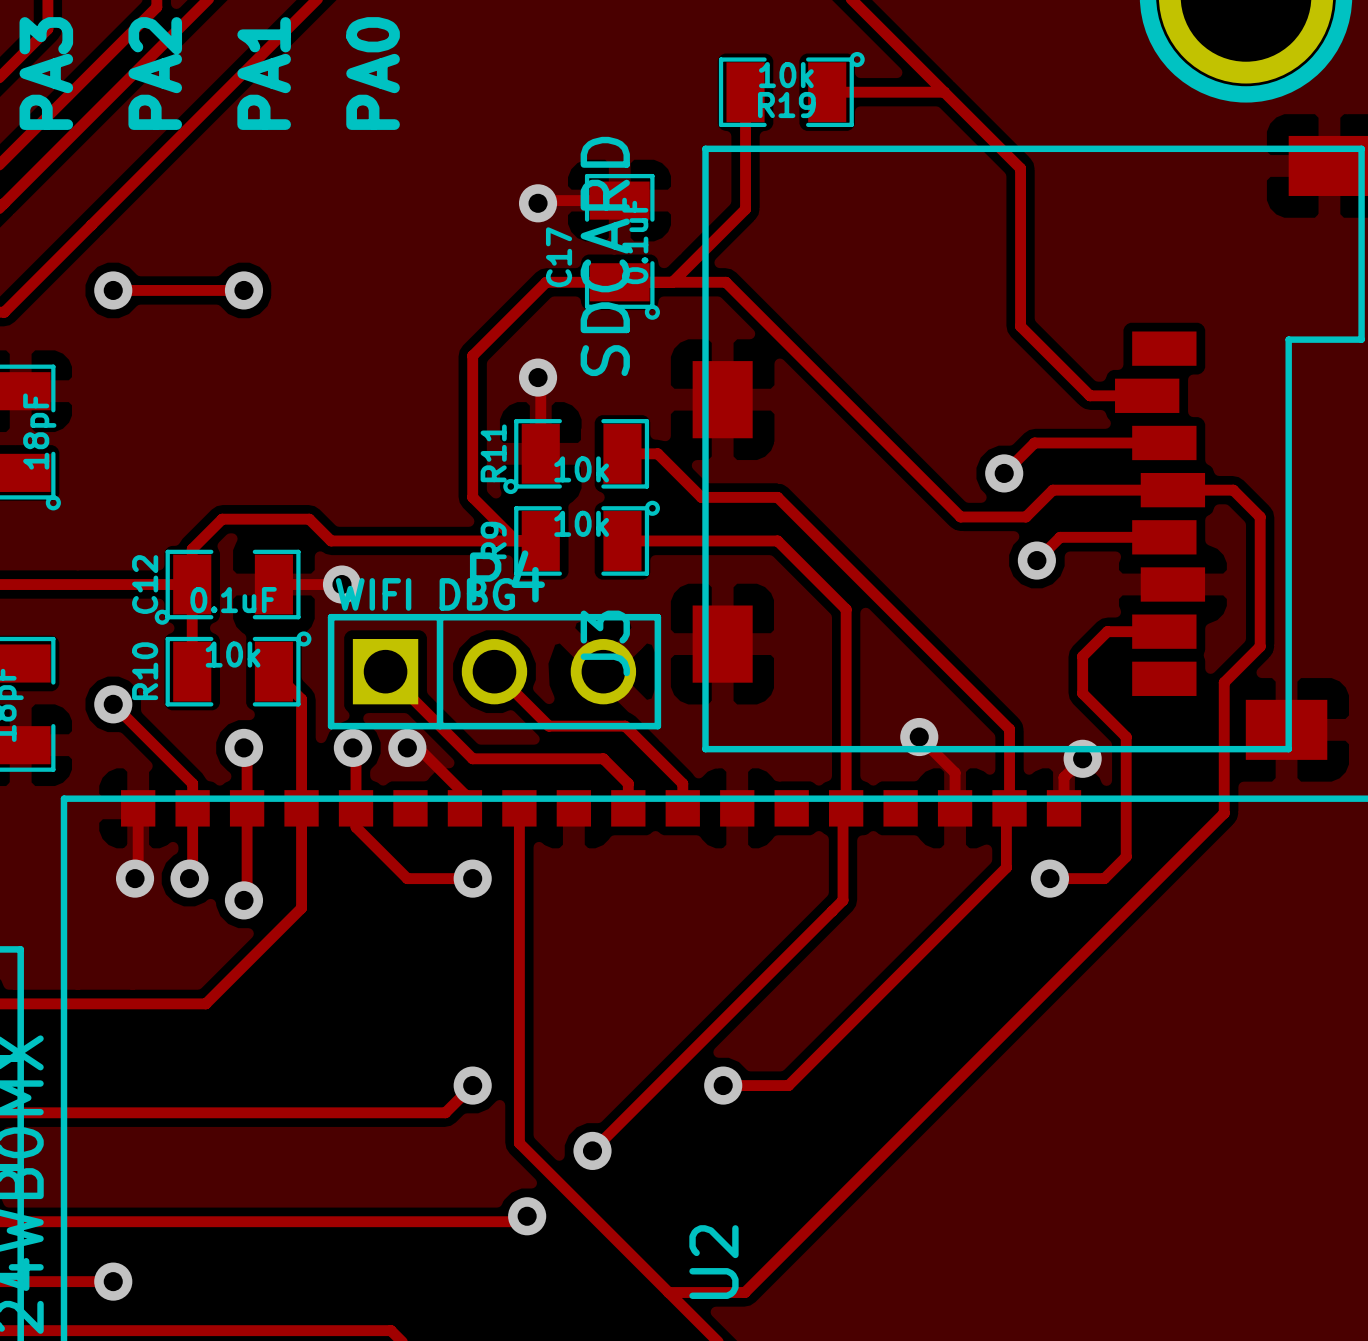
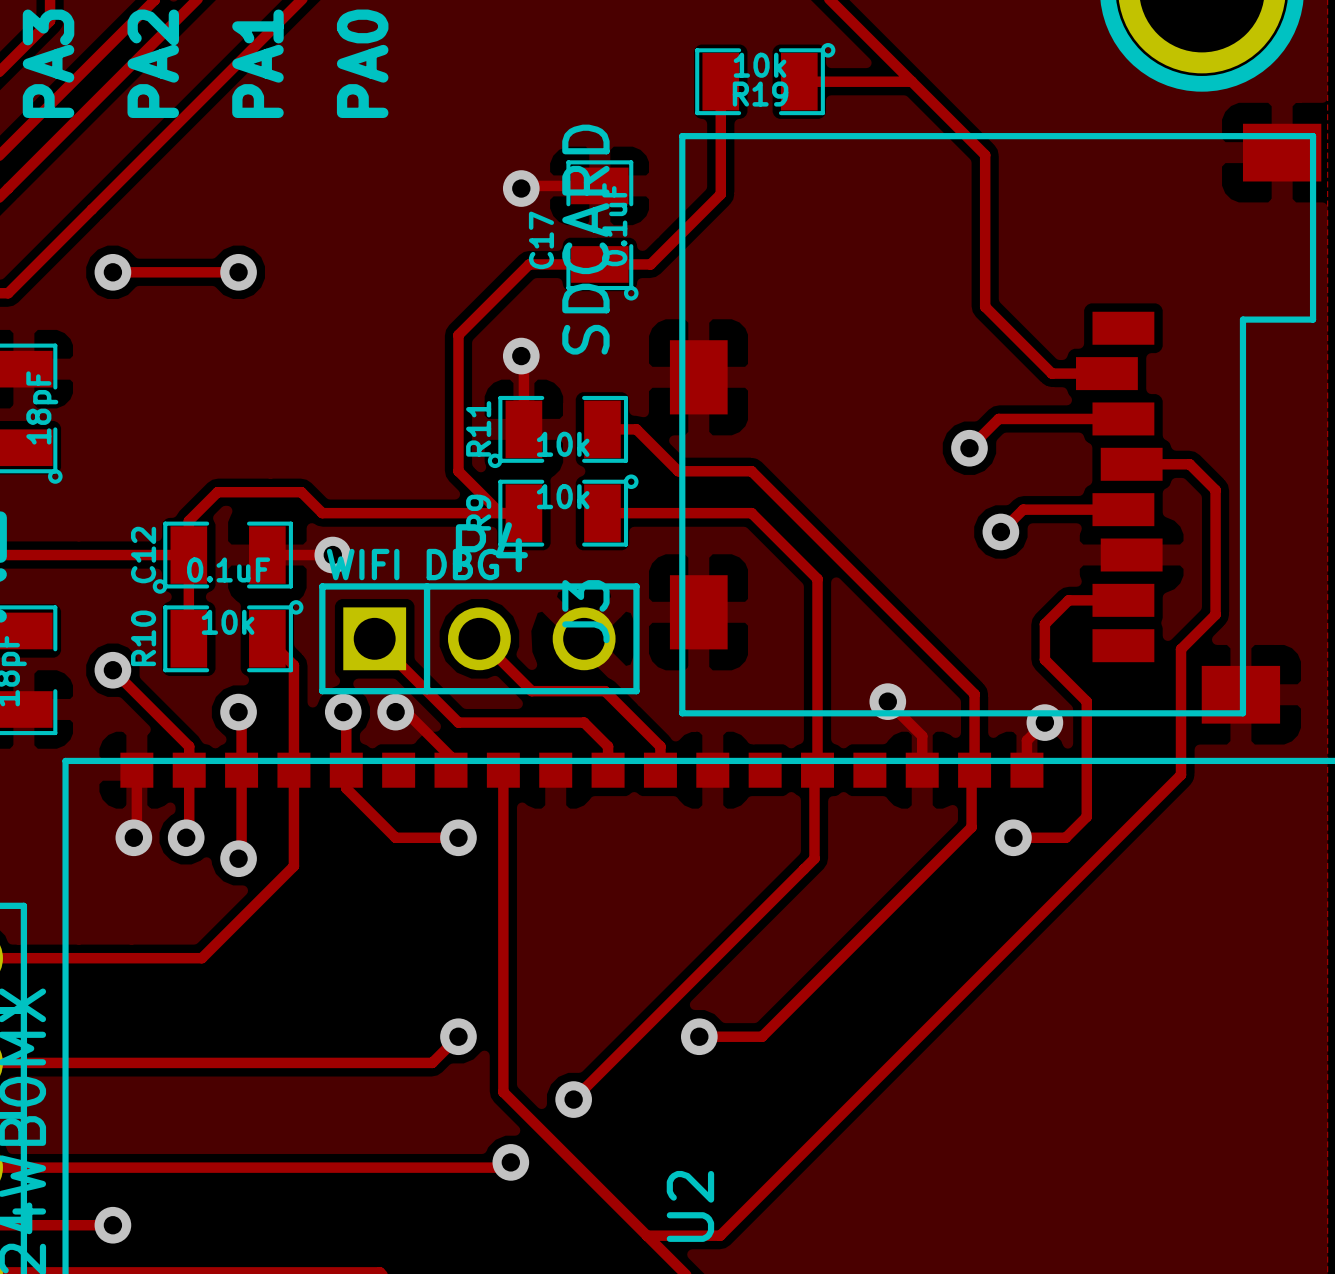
track: (672, 282) (725, 282) (960, 516) (1026, 516) (1052, 490) (1172, 490) -> none

